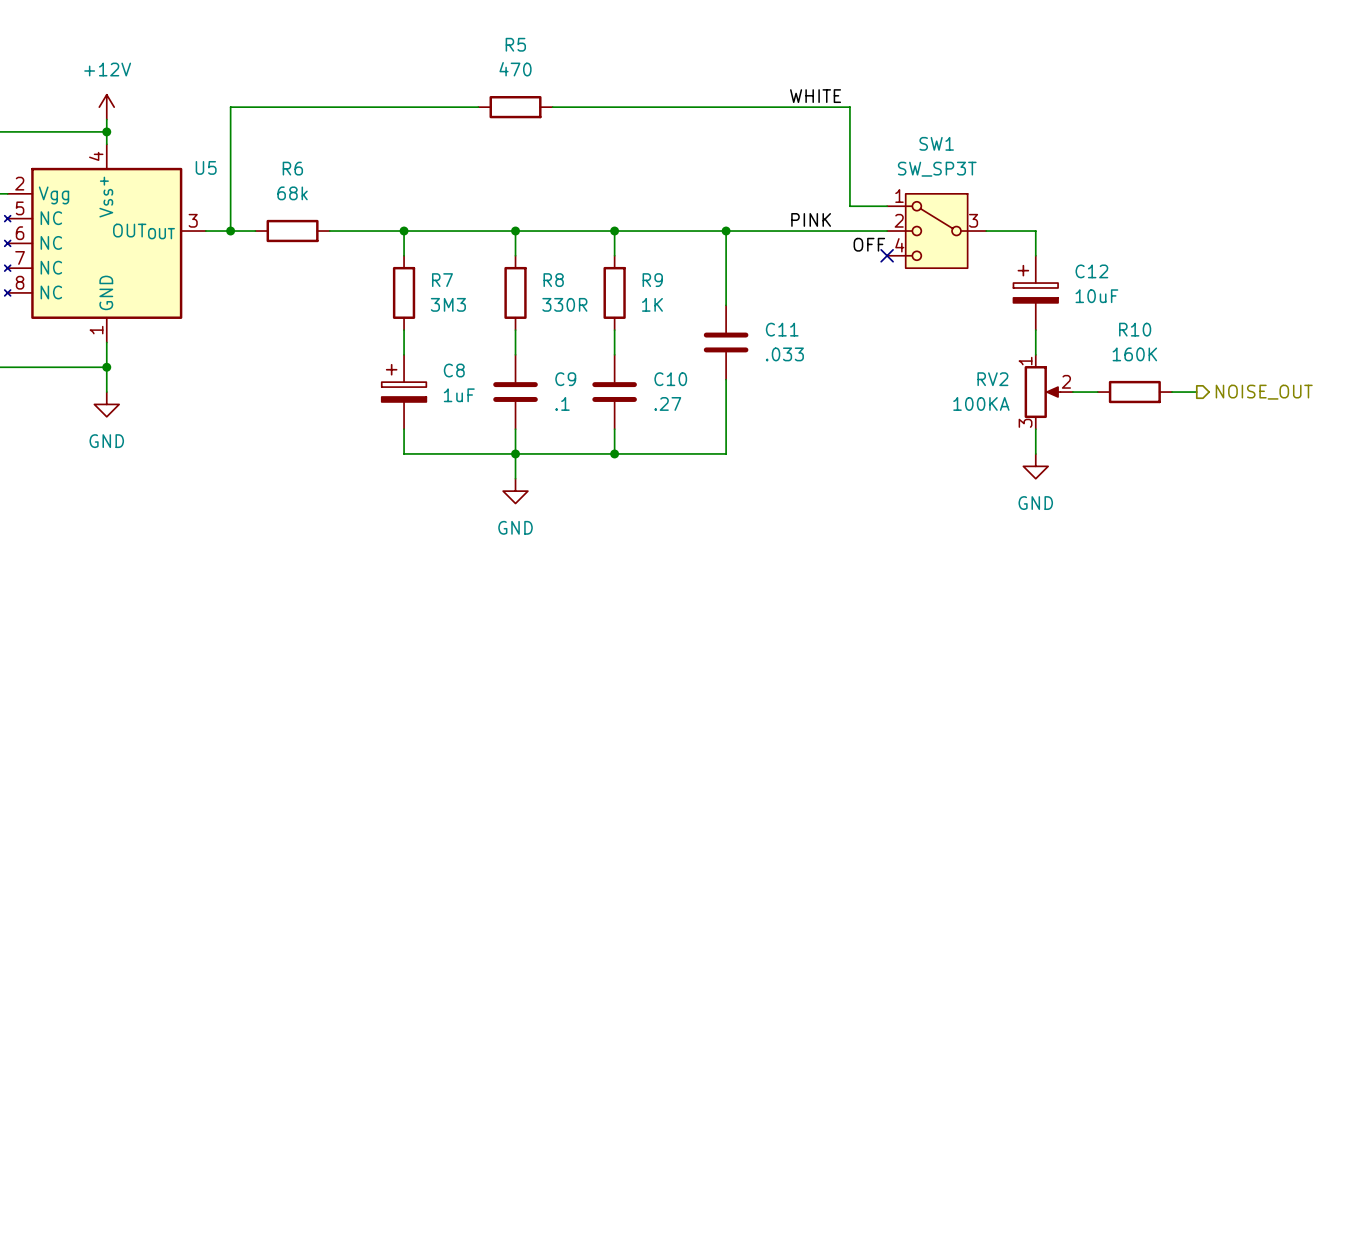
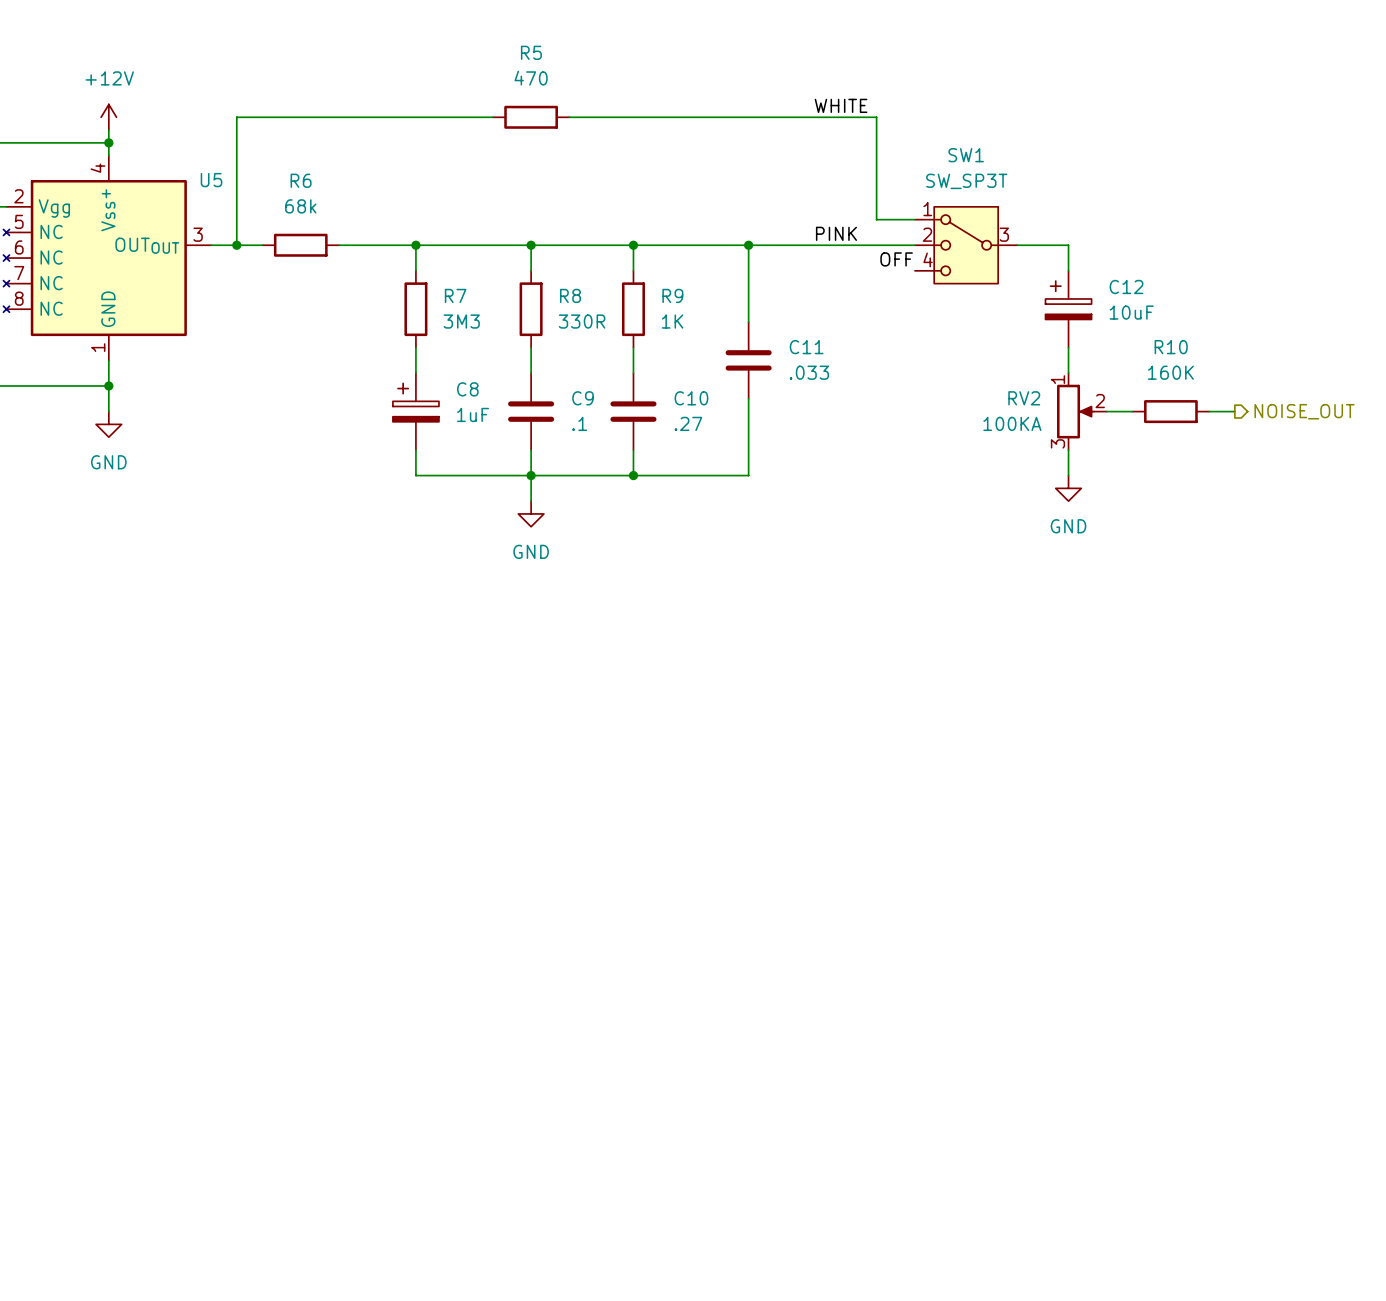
no-connect mark: (887, 255) -> none

